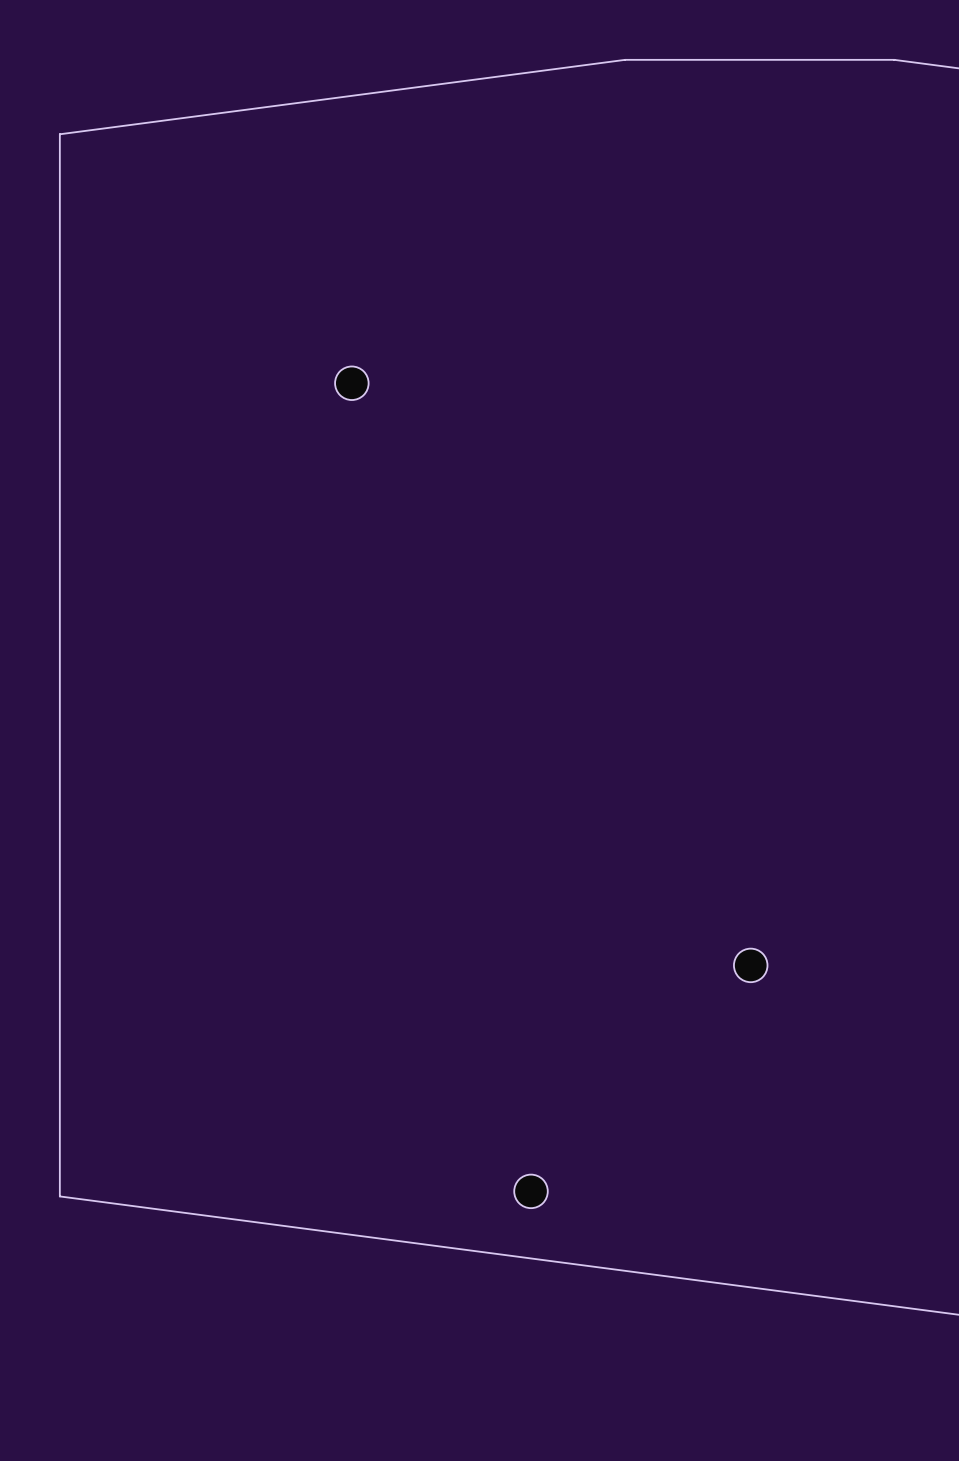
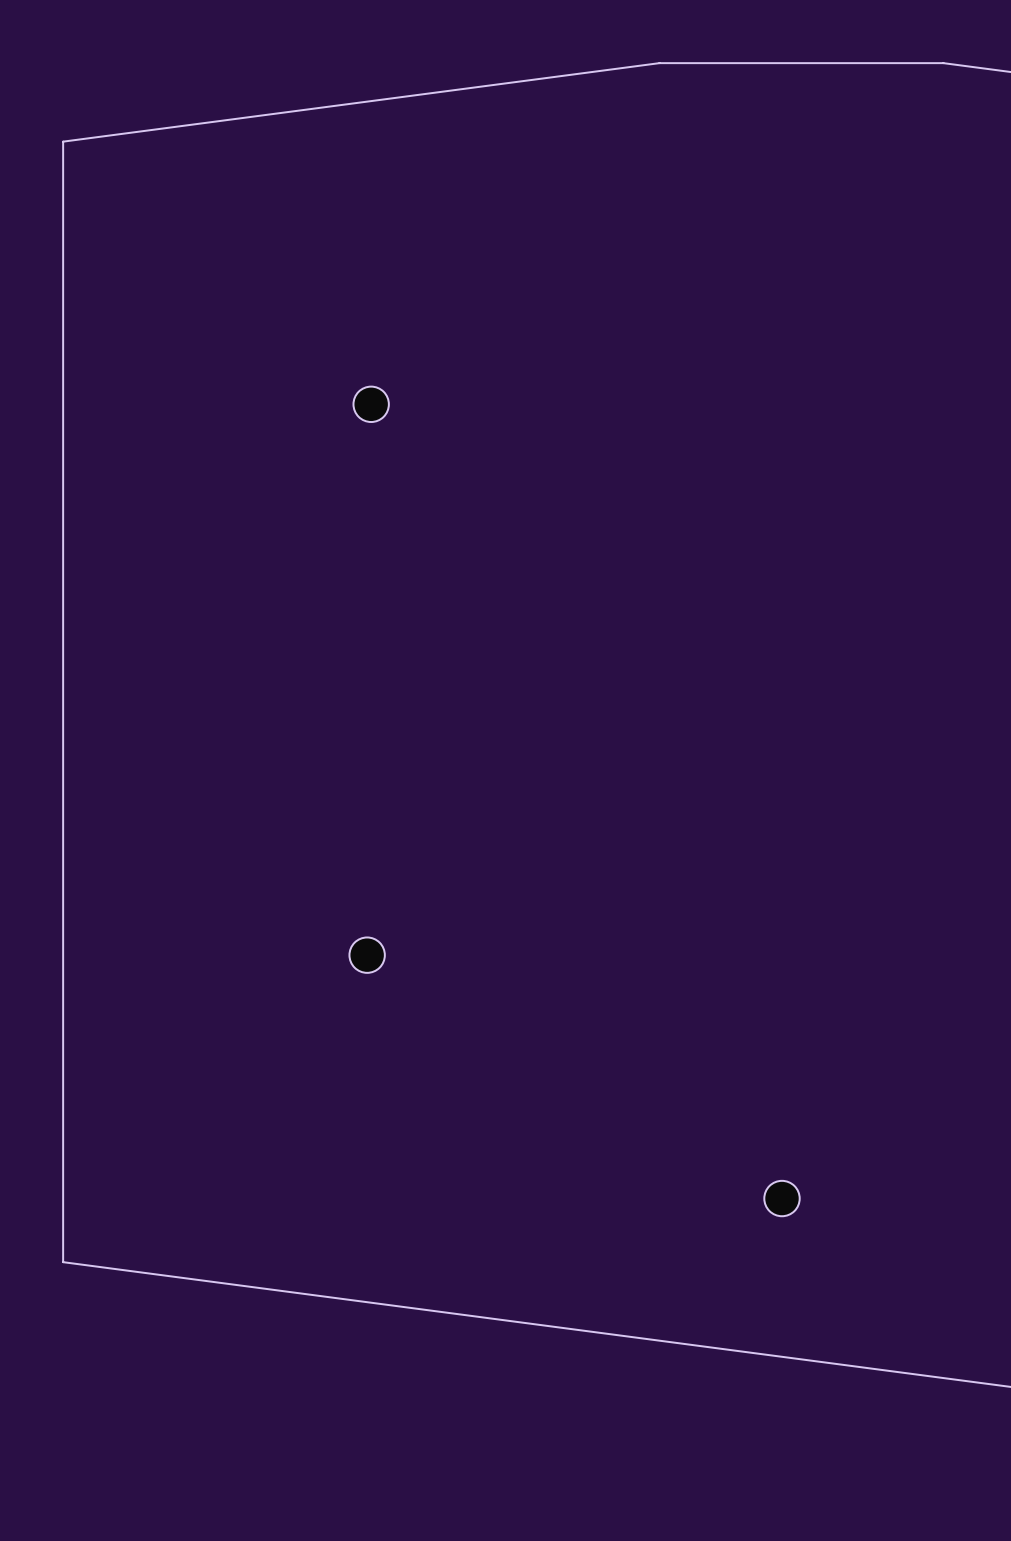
part: none -> (367, 955)
part: (750, 965) -> none
part: none -> (782, 1198)
part: (531, 1191) -> none

